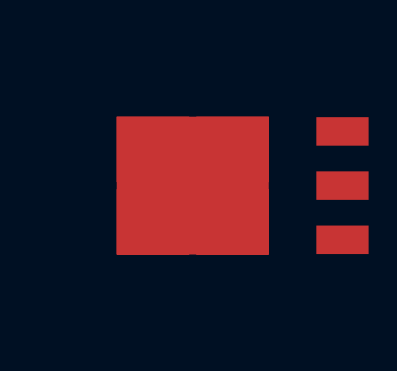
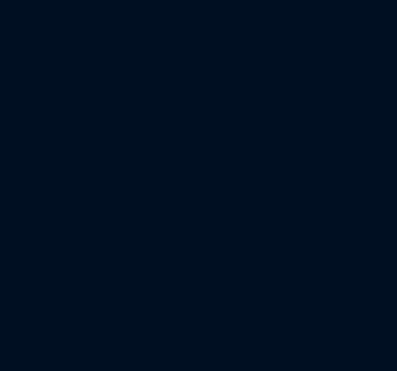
part: (242, 185) -> none

